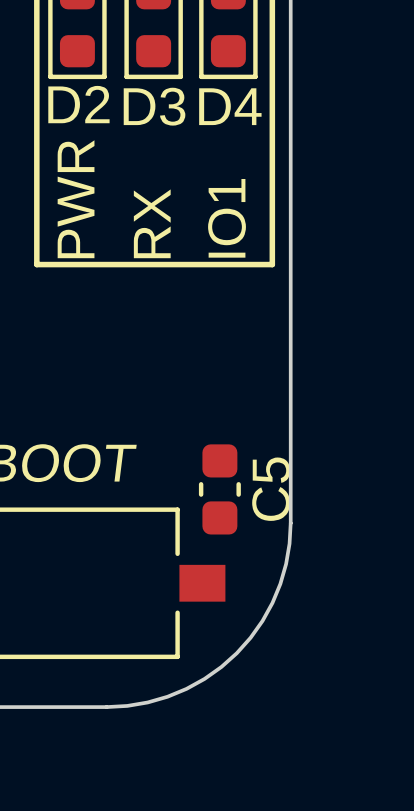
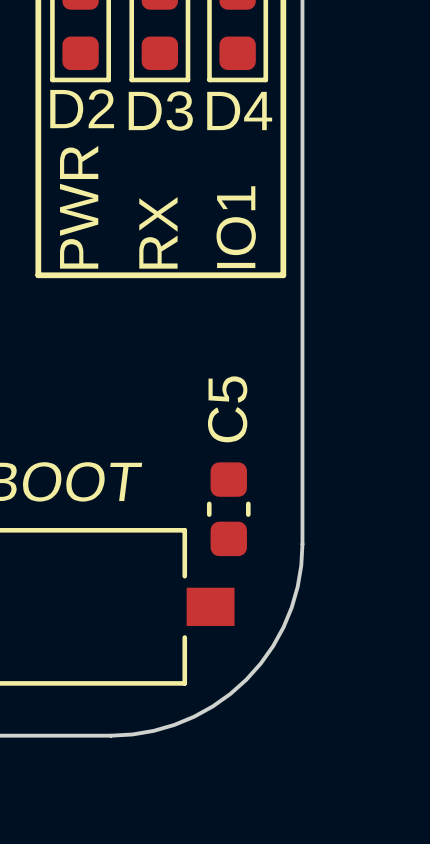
C5 name position: C5 (271, 489) -> C5 (227, 409)

